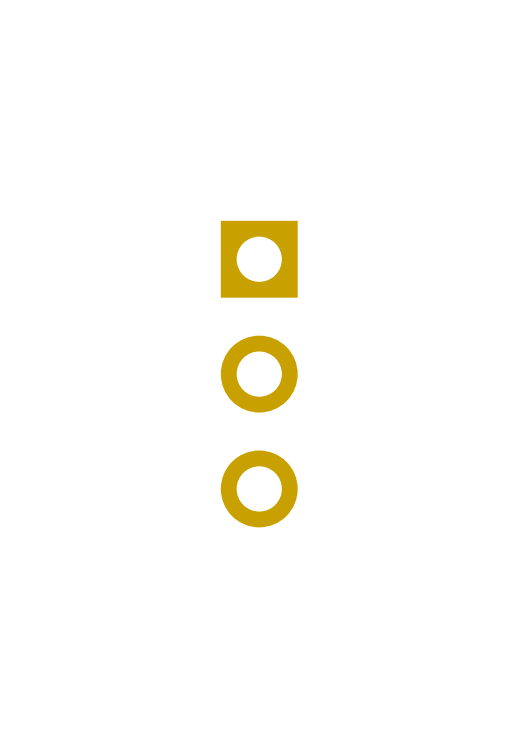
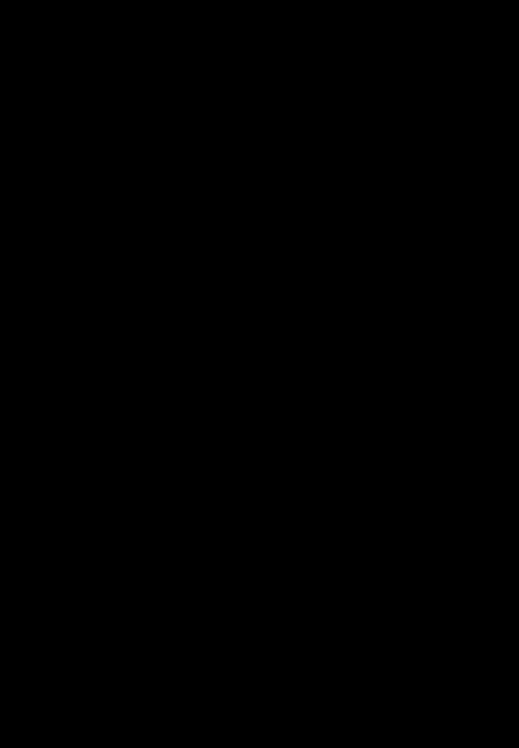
part: (259, 374) -> none

